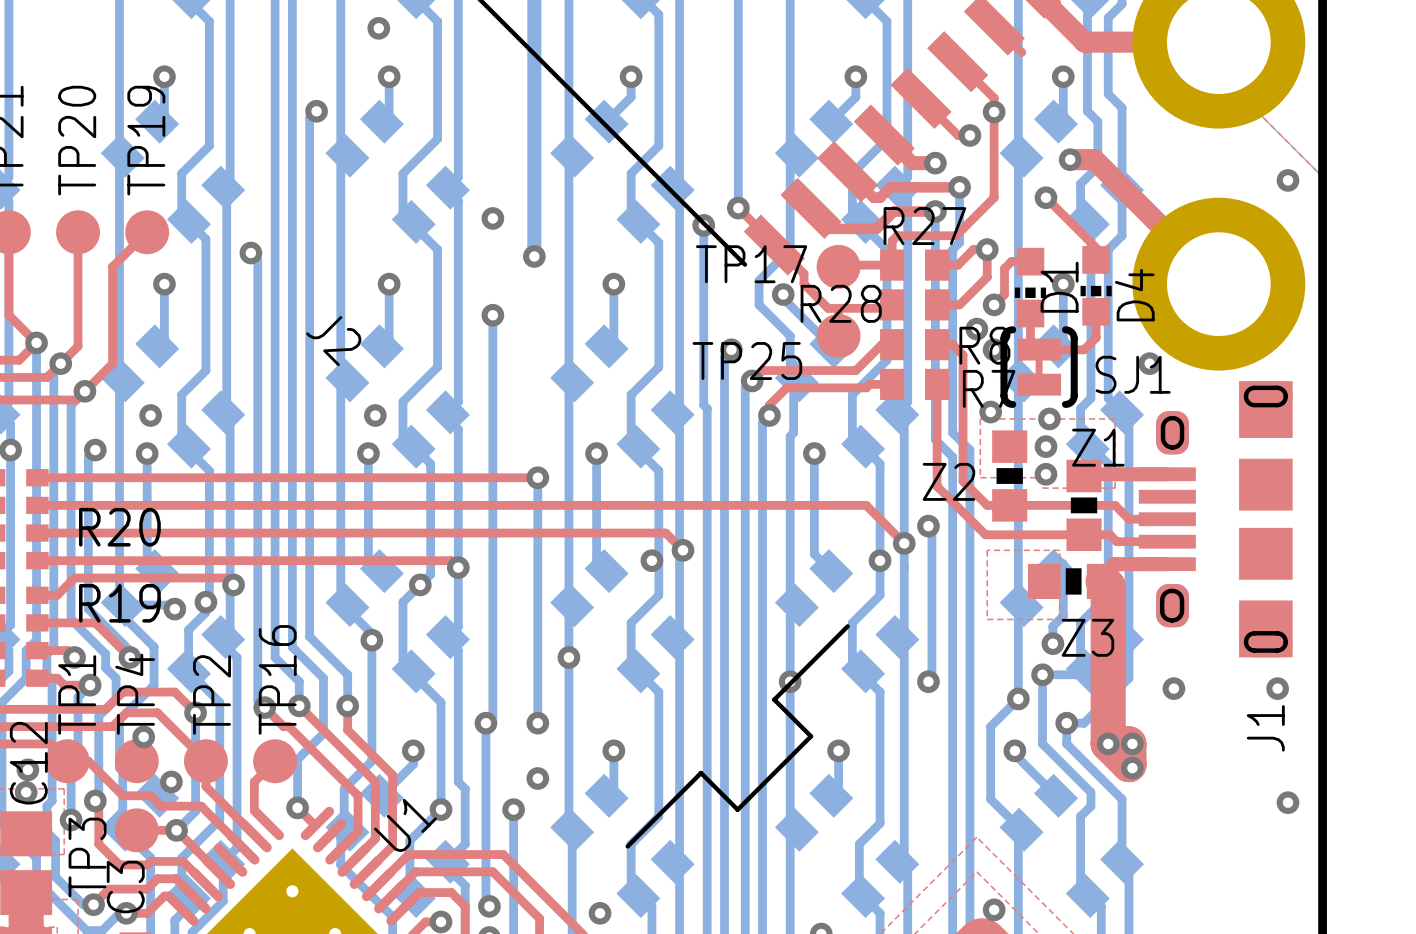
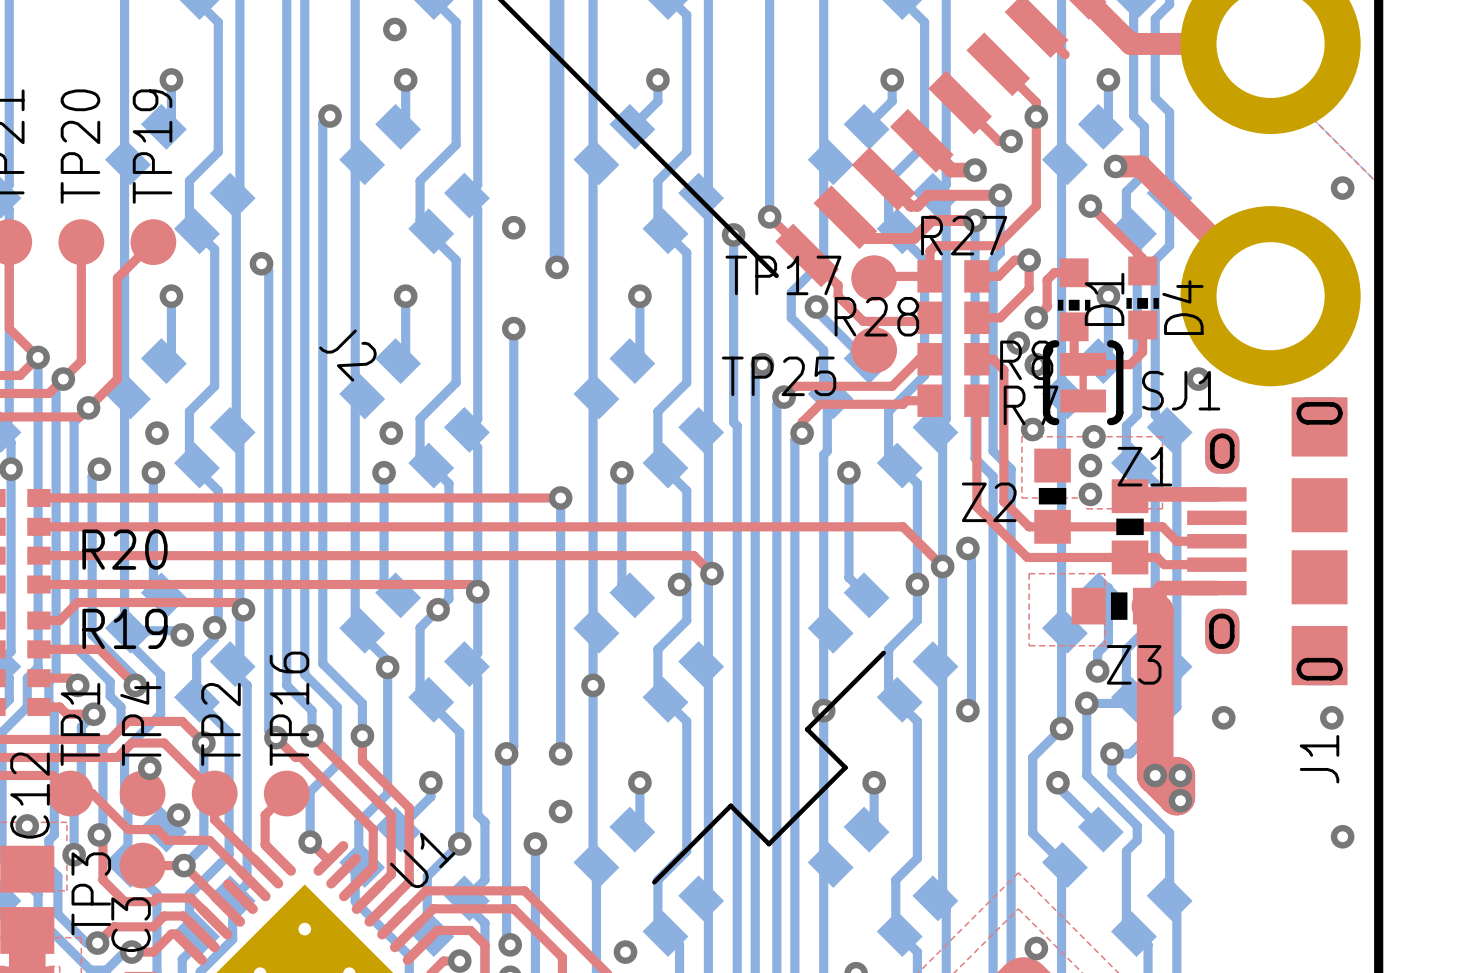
via: (27, 769) -> none

